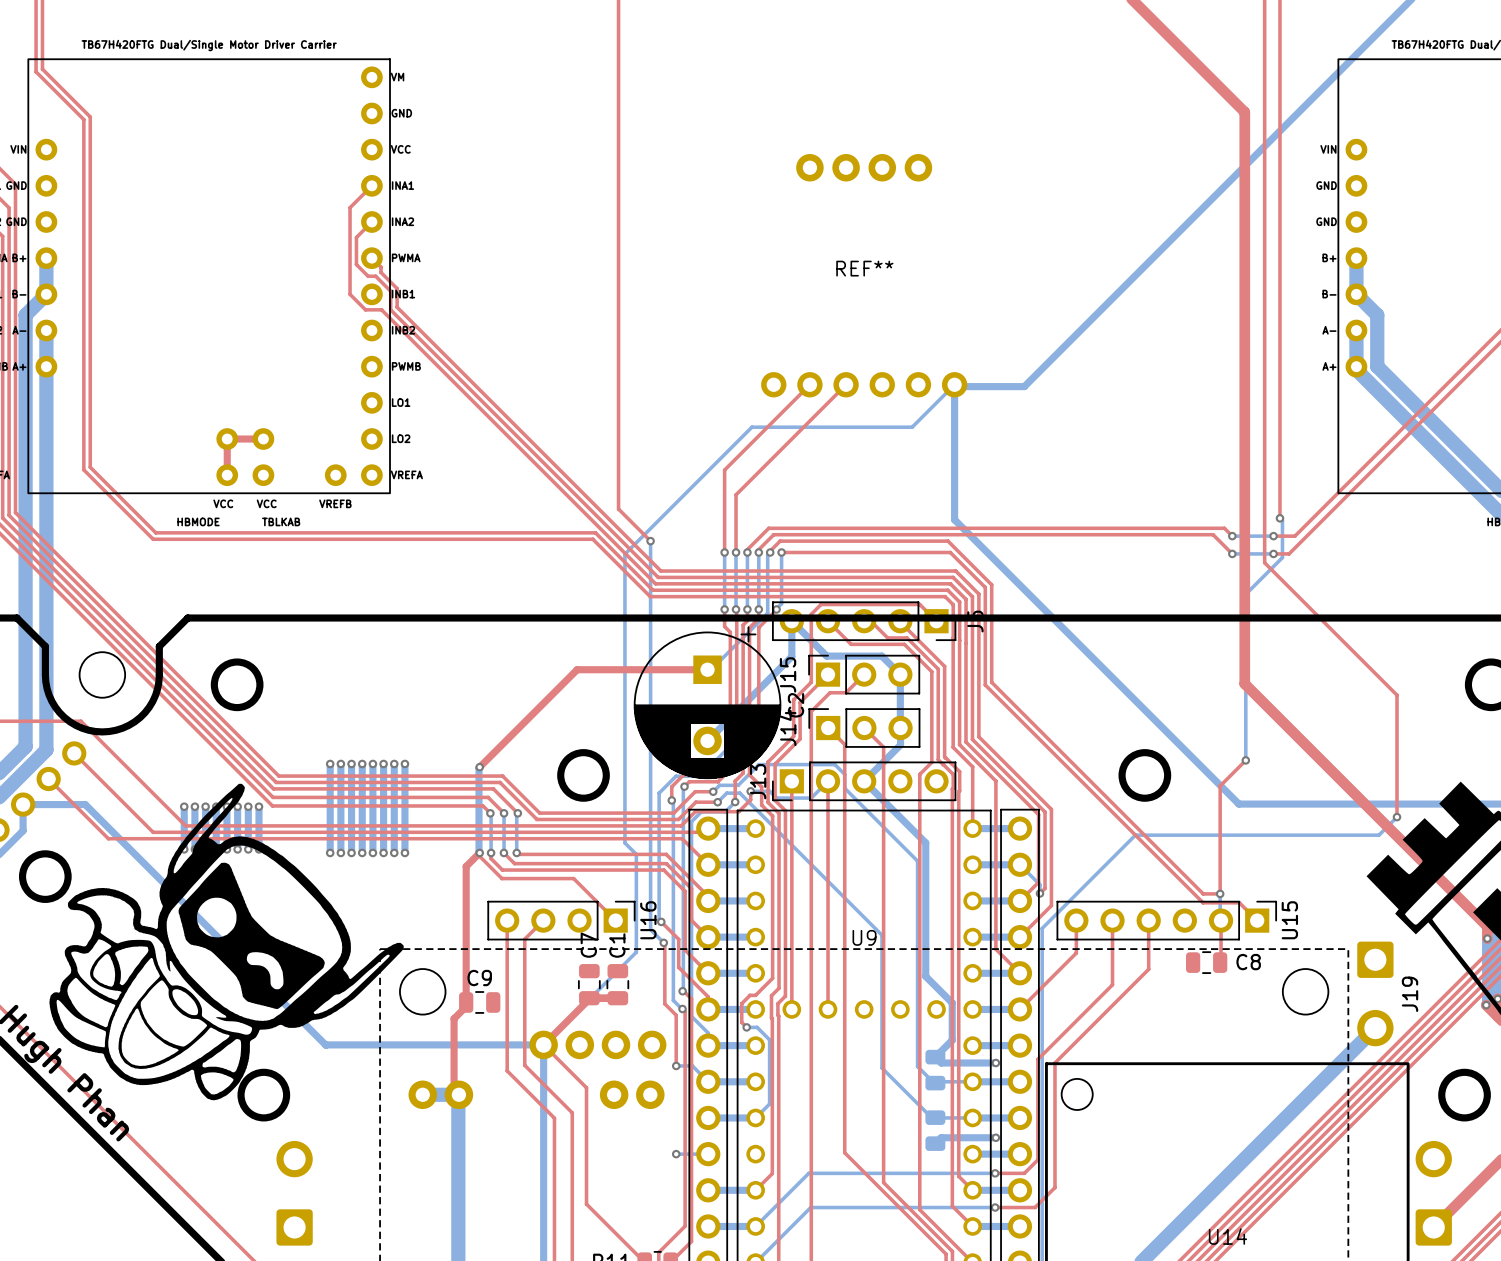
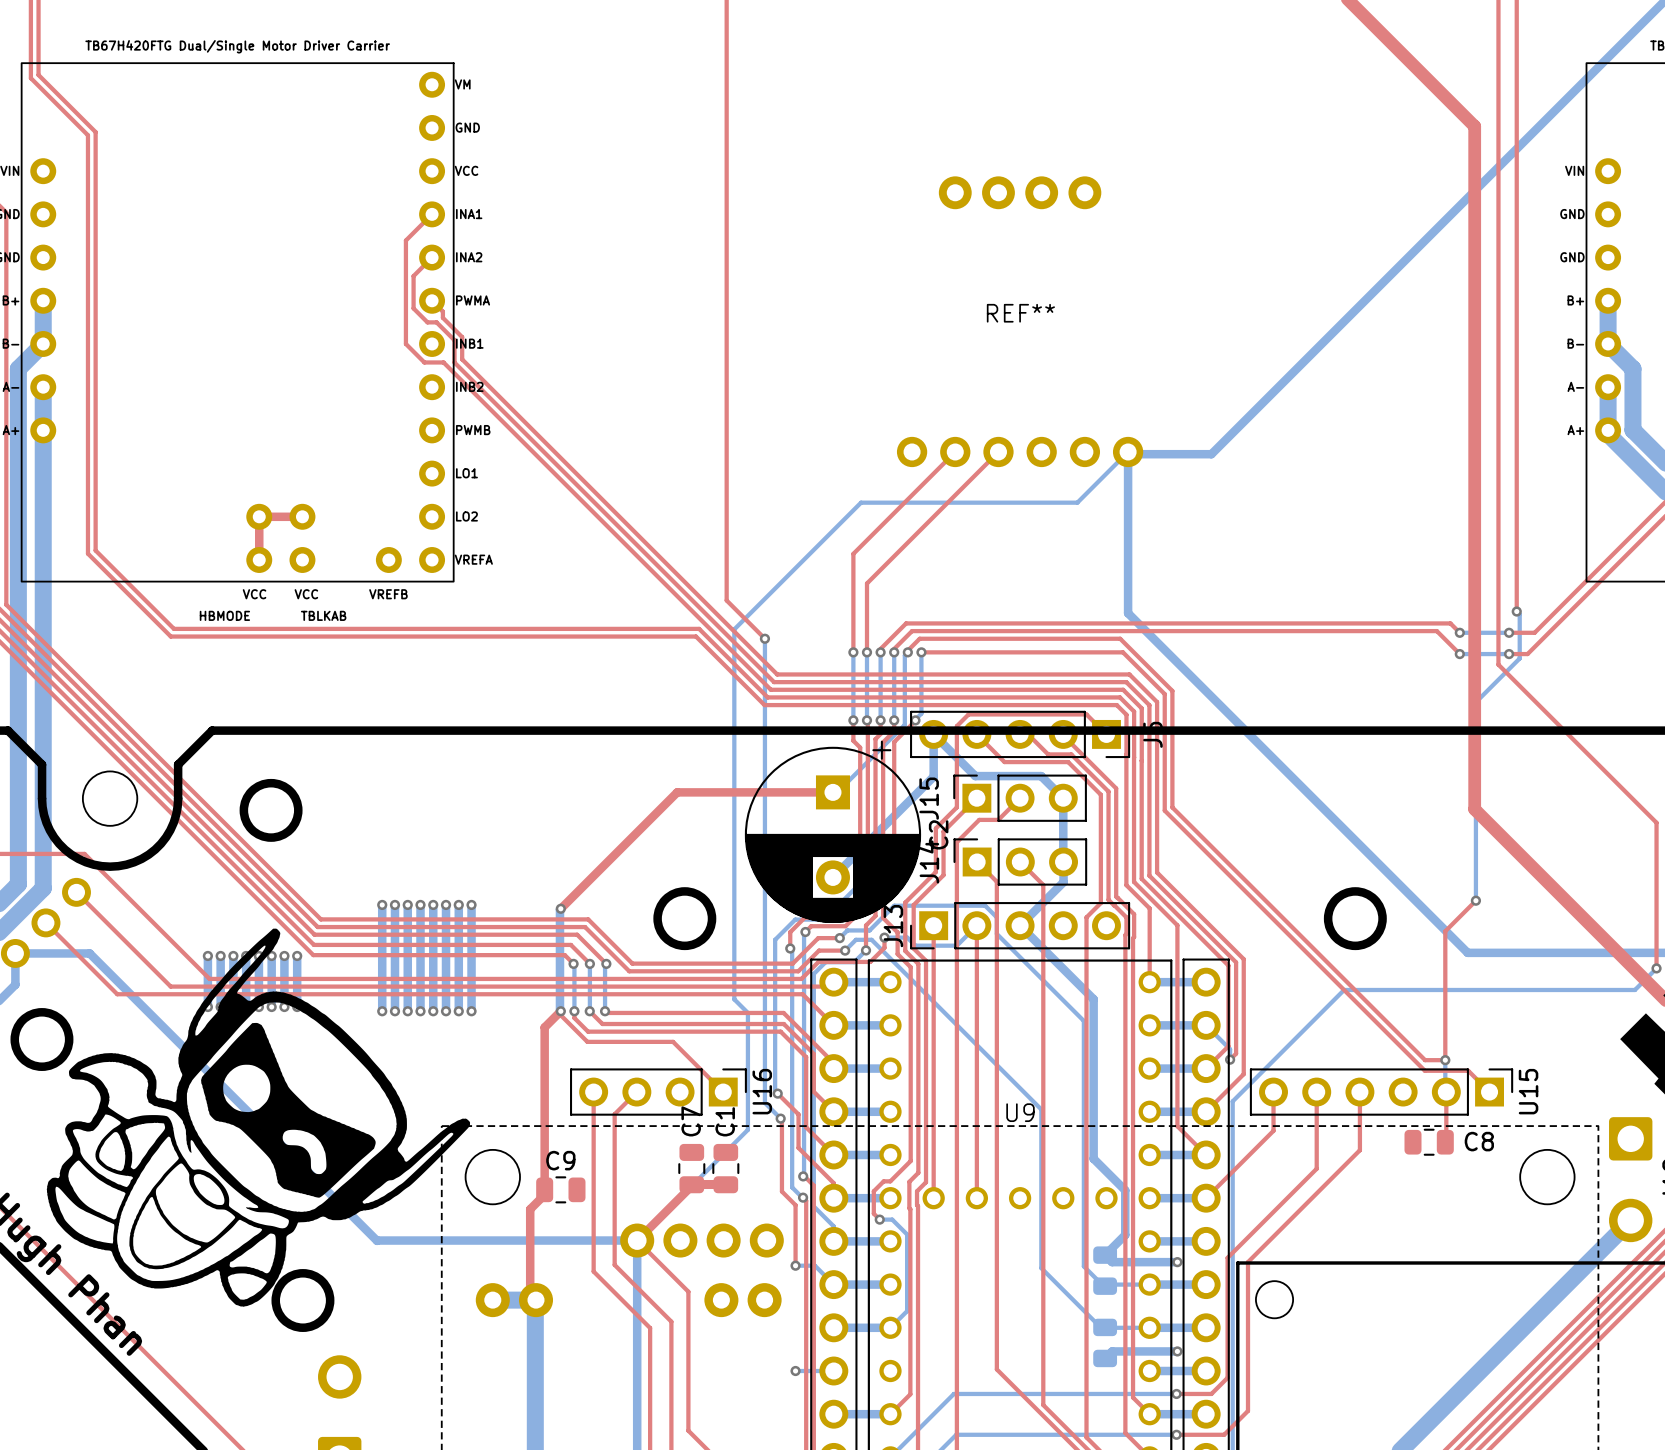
bottom track: (751, 427) (624, 554) -> (885, 502) (861, 502) (734, 629) (734, 654)

